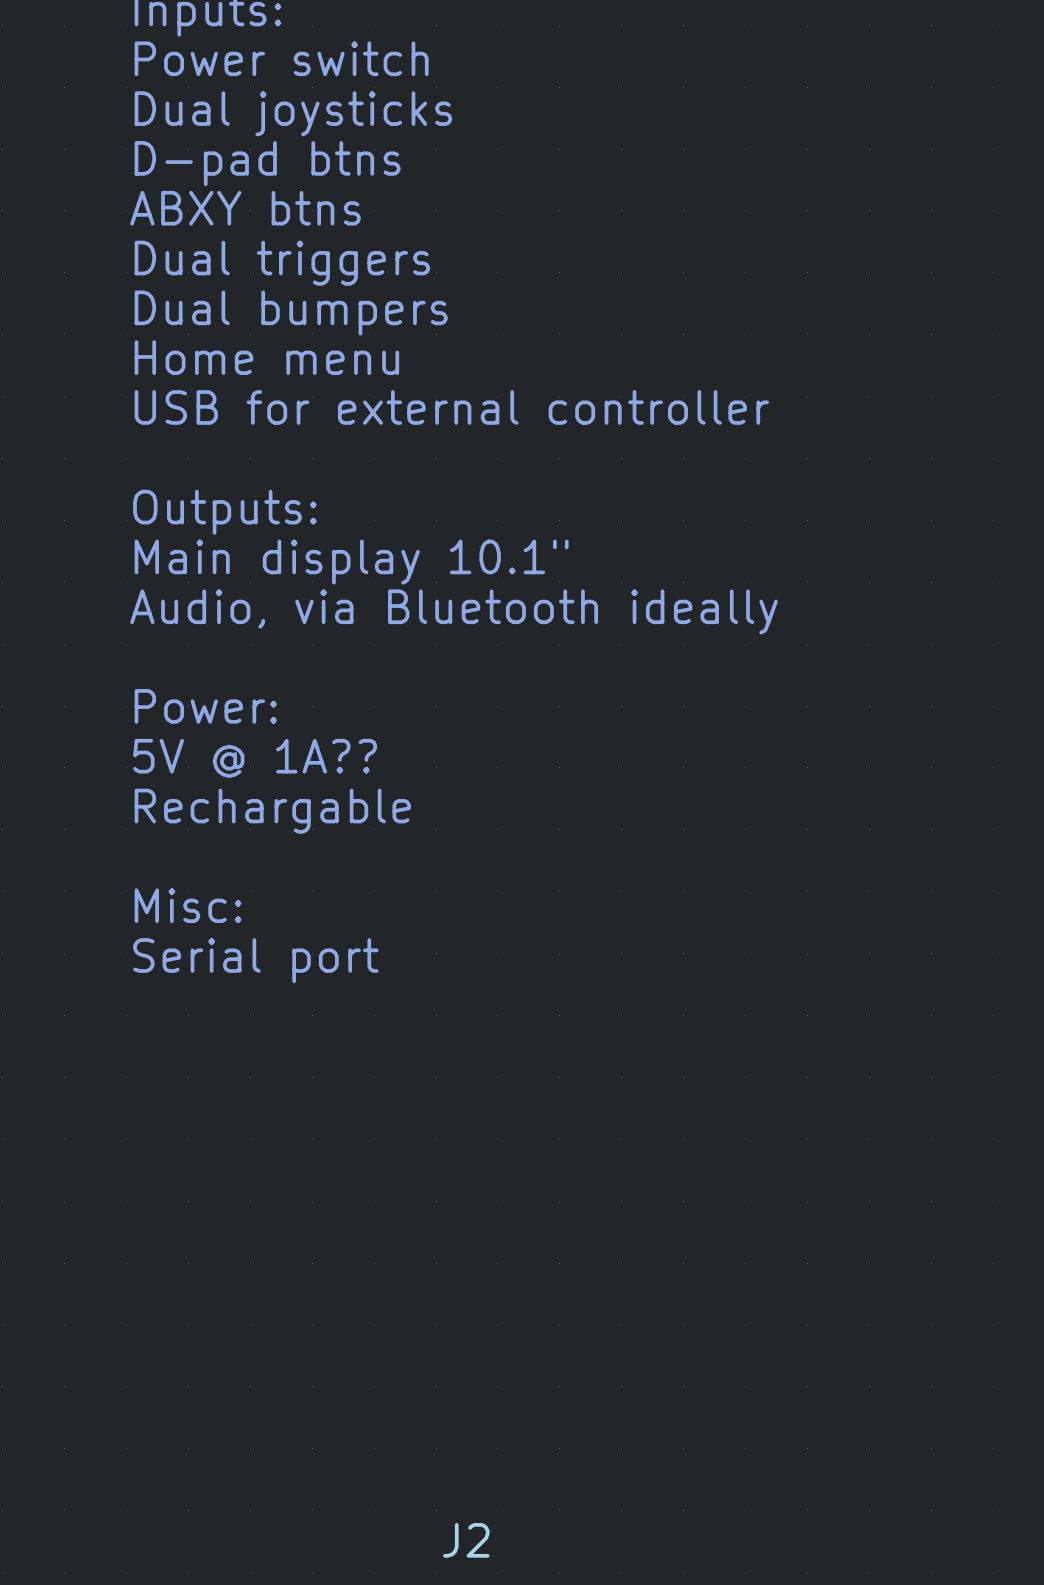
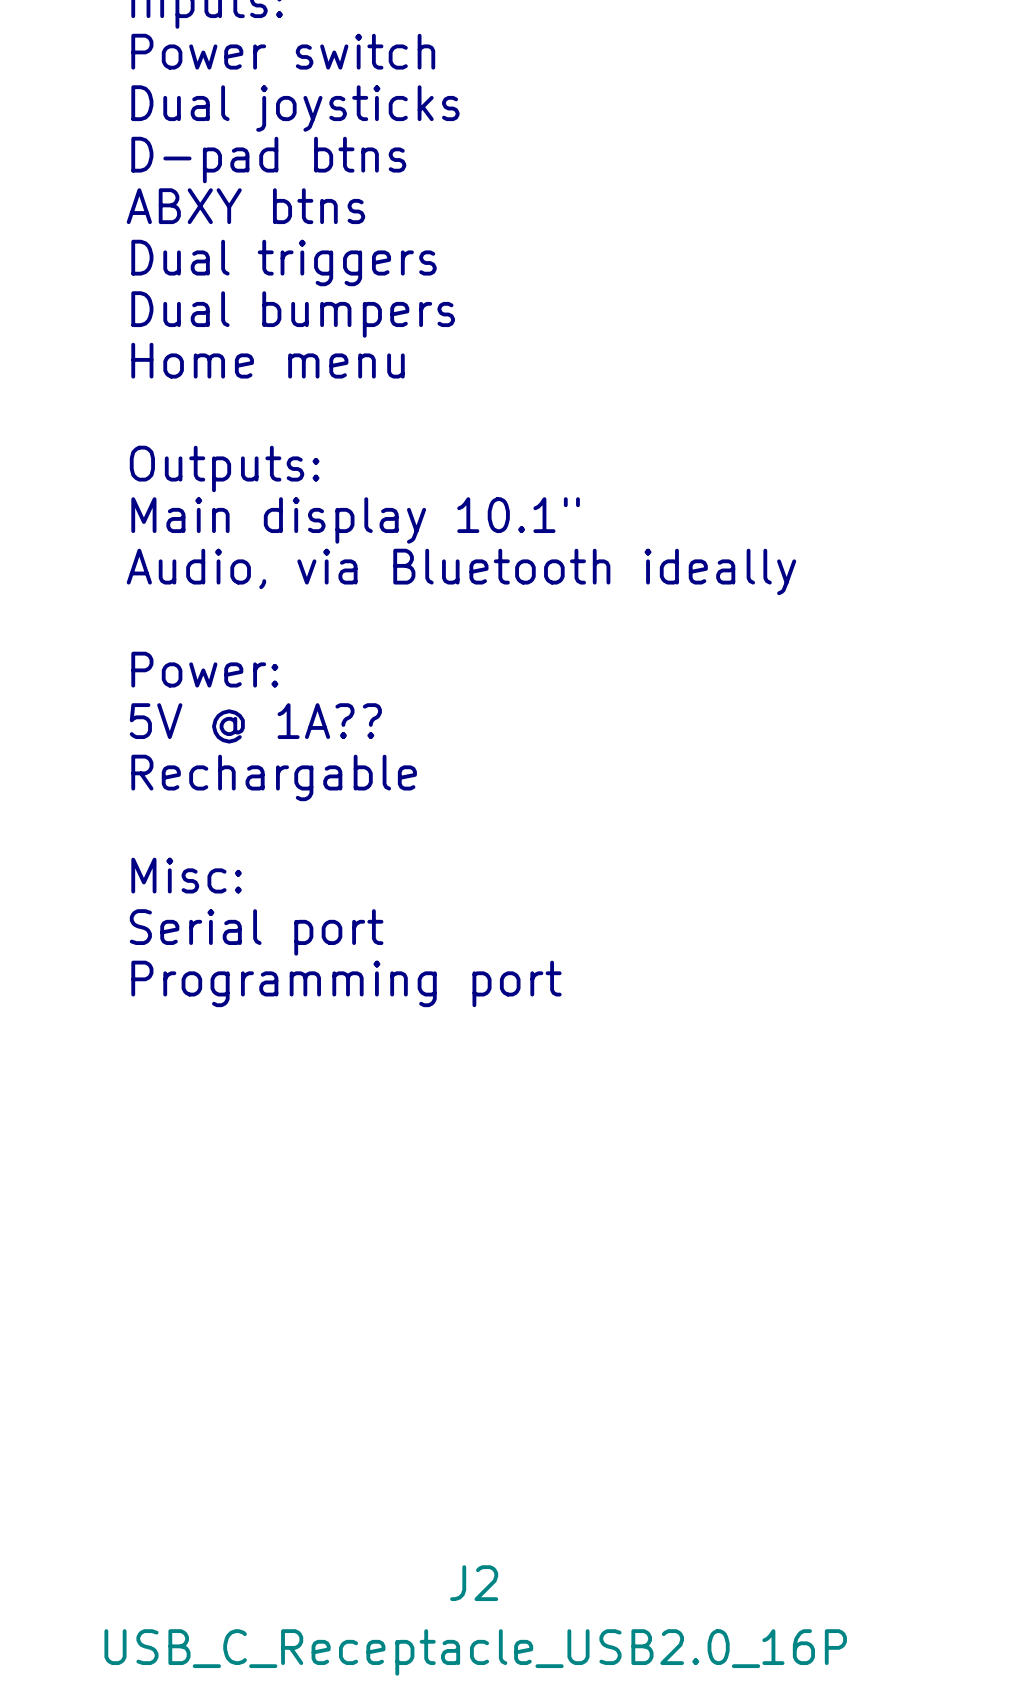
text: USB for external controller (451, 407) -> none
text: none -> Outputs: (224, 468)
text: Outputs: (224, 512) -> Main display 10.1" (355, 520)
text: Main display 10.1" (351, 562) -> Audio, via Bluetooth ideally (461, 571)
text: Audio, via Bluetooth ideally (454, 611) -> none
text: none -> Power: (204, 669)
text: Power: (205, 706) -> 5V @ 1A?? (255, 723)
text: 5V @ 1A?? (255, 758) -> Rechargable (274, 777)
text: Rechargable (272, 811) -> none
text: none -> Misc: (186, 875)
text: Misc: (188, 905) -> Serial port (256, 932)
text: Serial port (255, 960) -> Programming port (346, 983)

